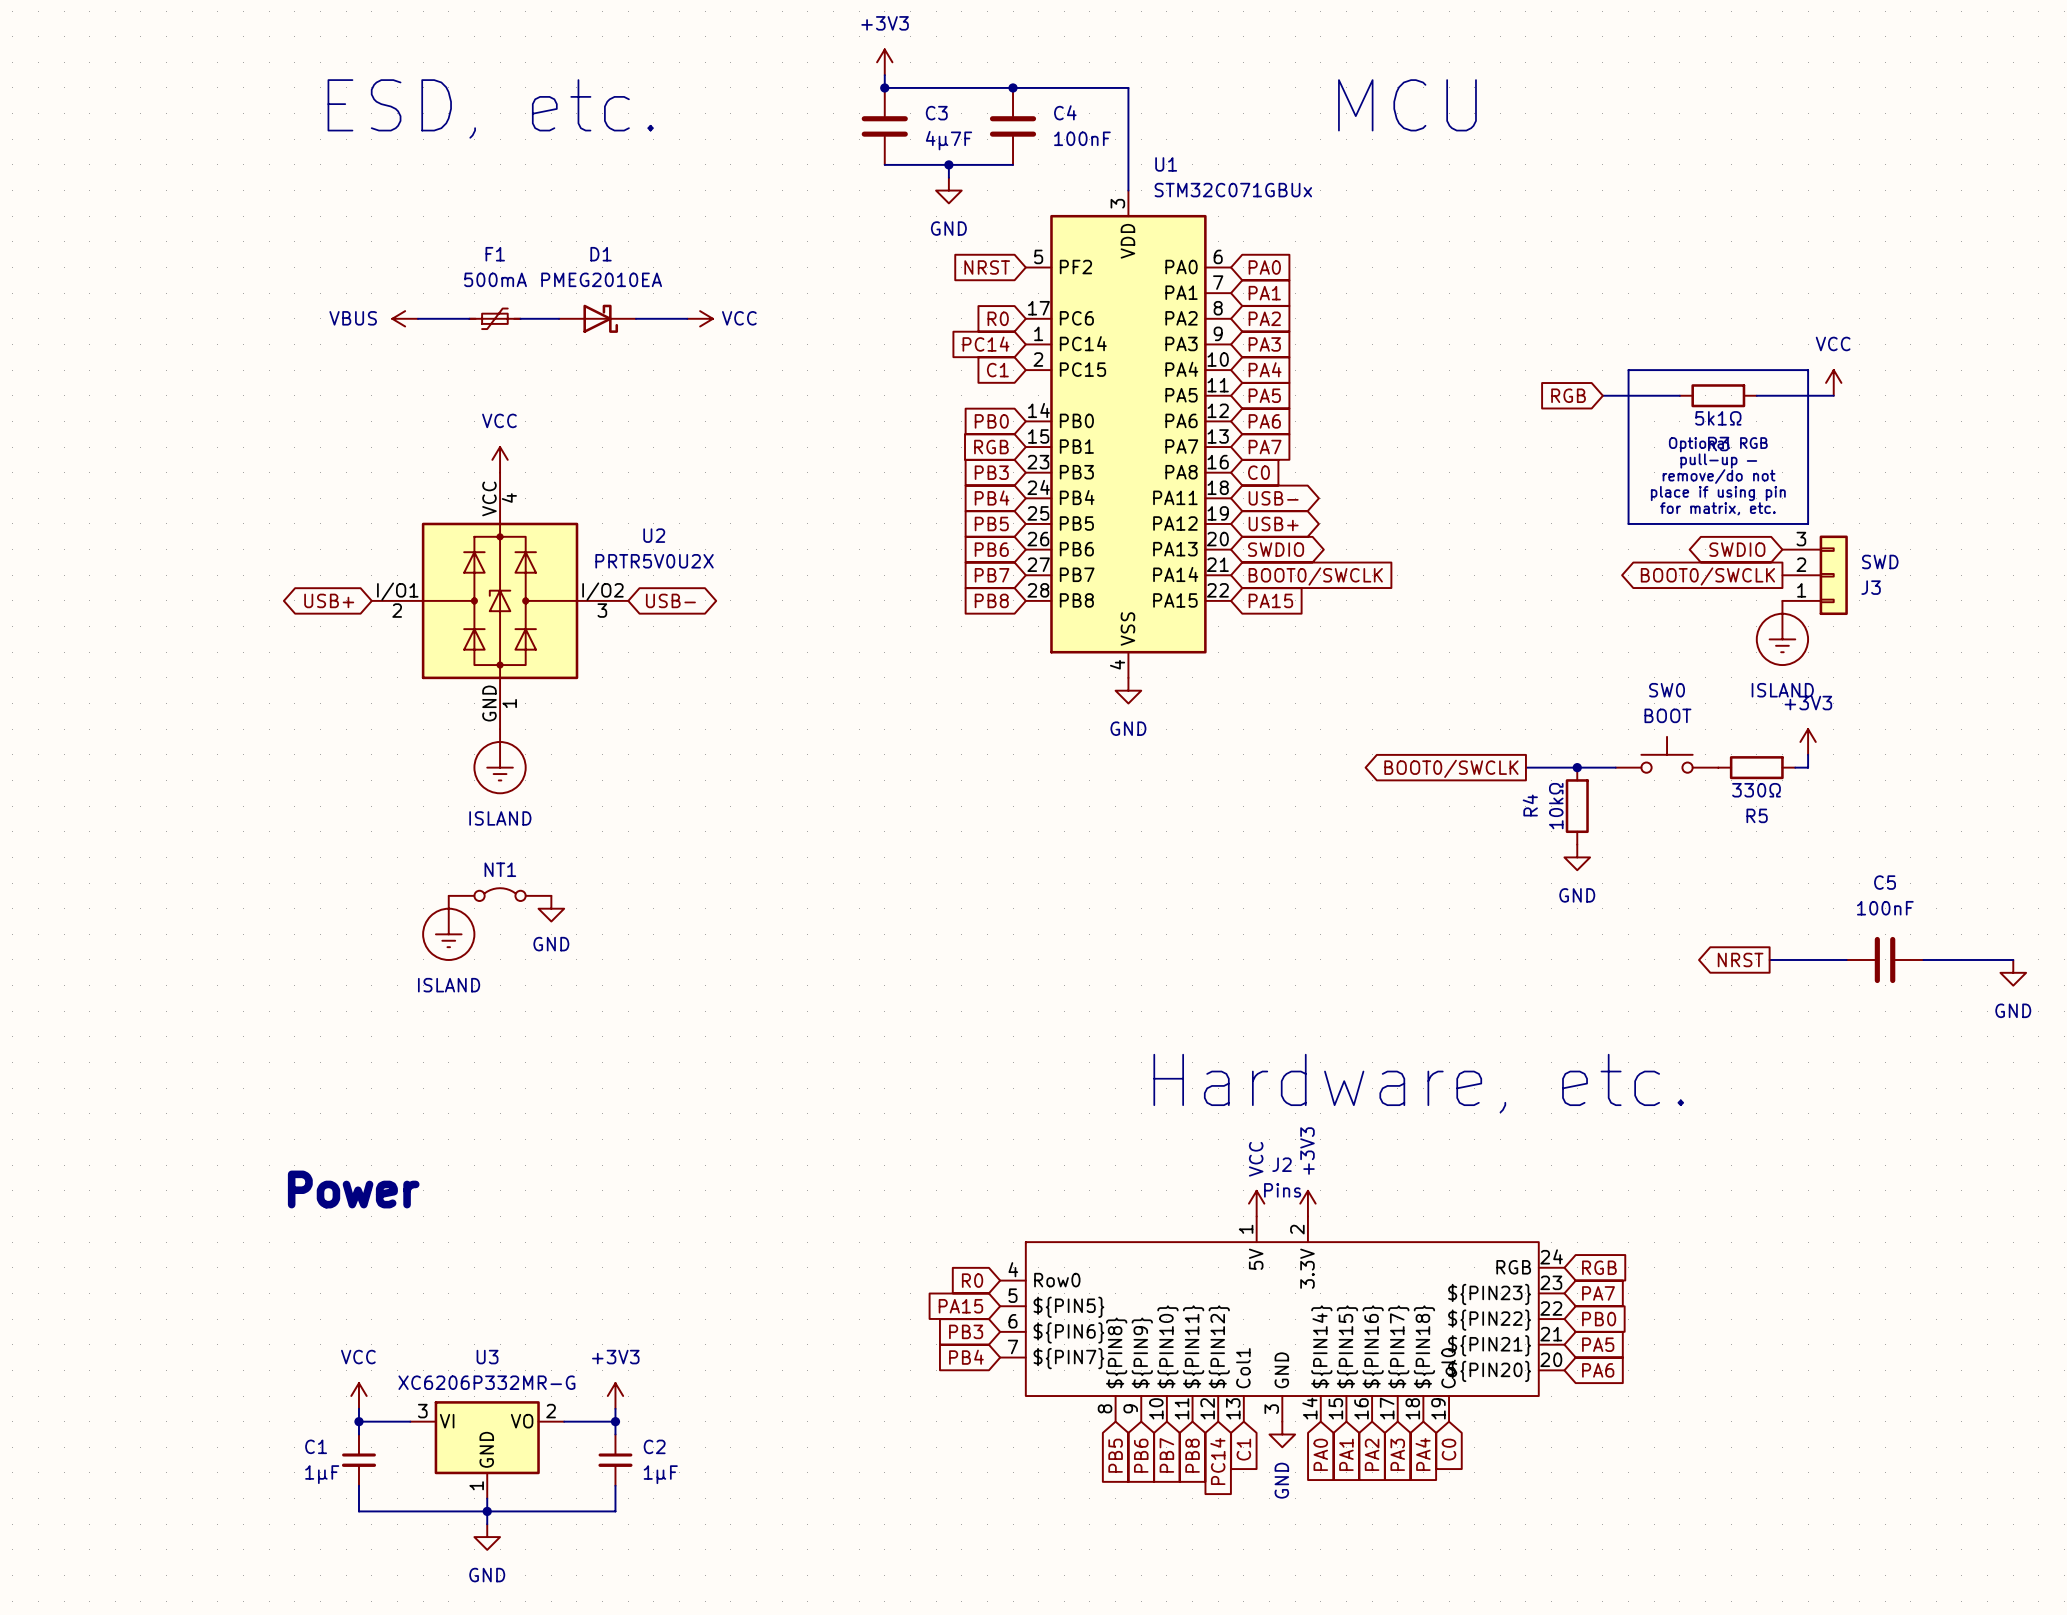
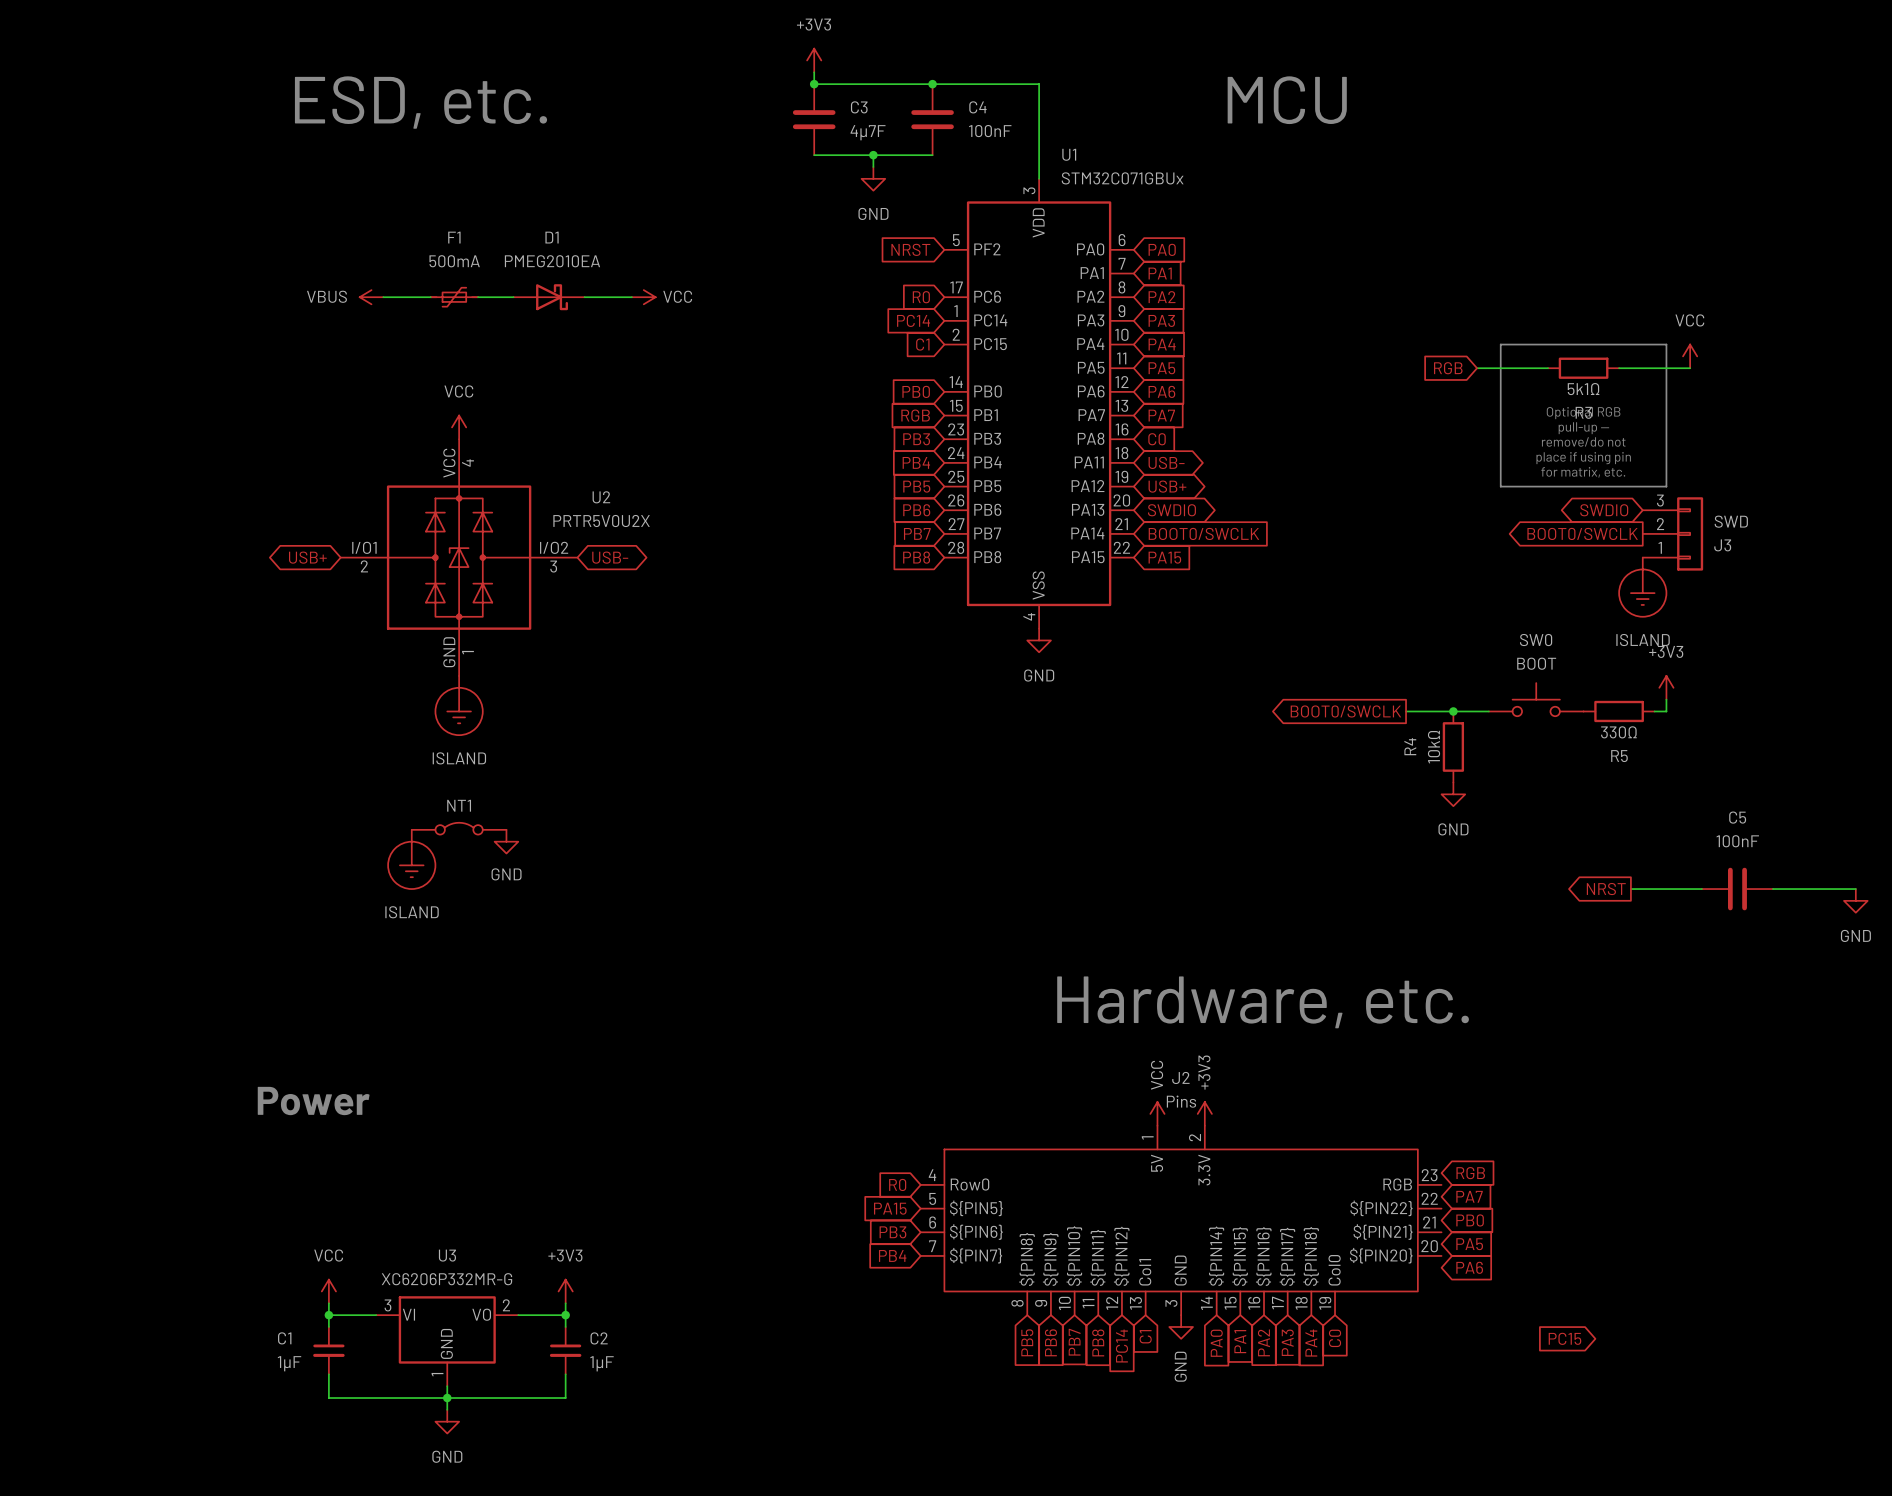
J2 symbol: [1000, 1216, 1565, 1422] -> [920, 1125, 1442, 1316]
global label: none -> PC15 (1564, 1338)

